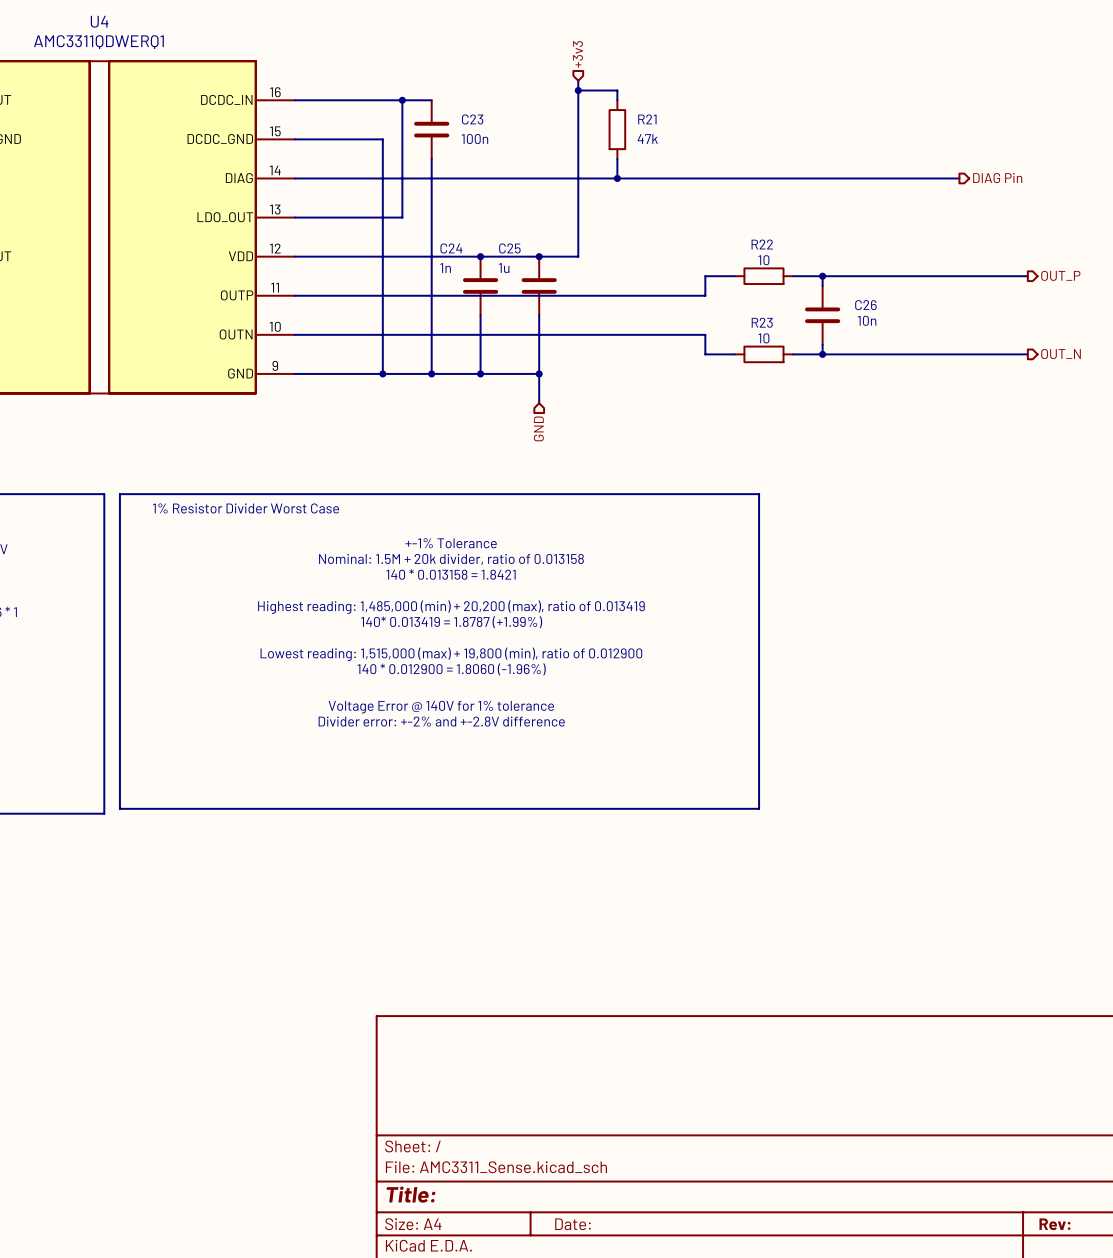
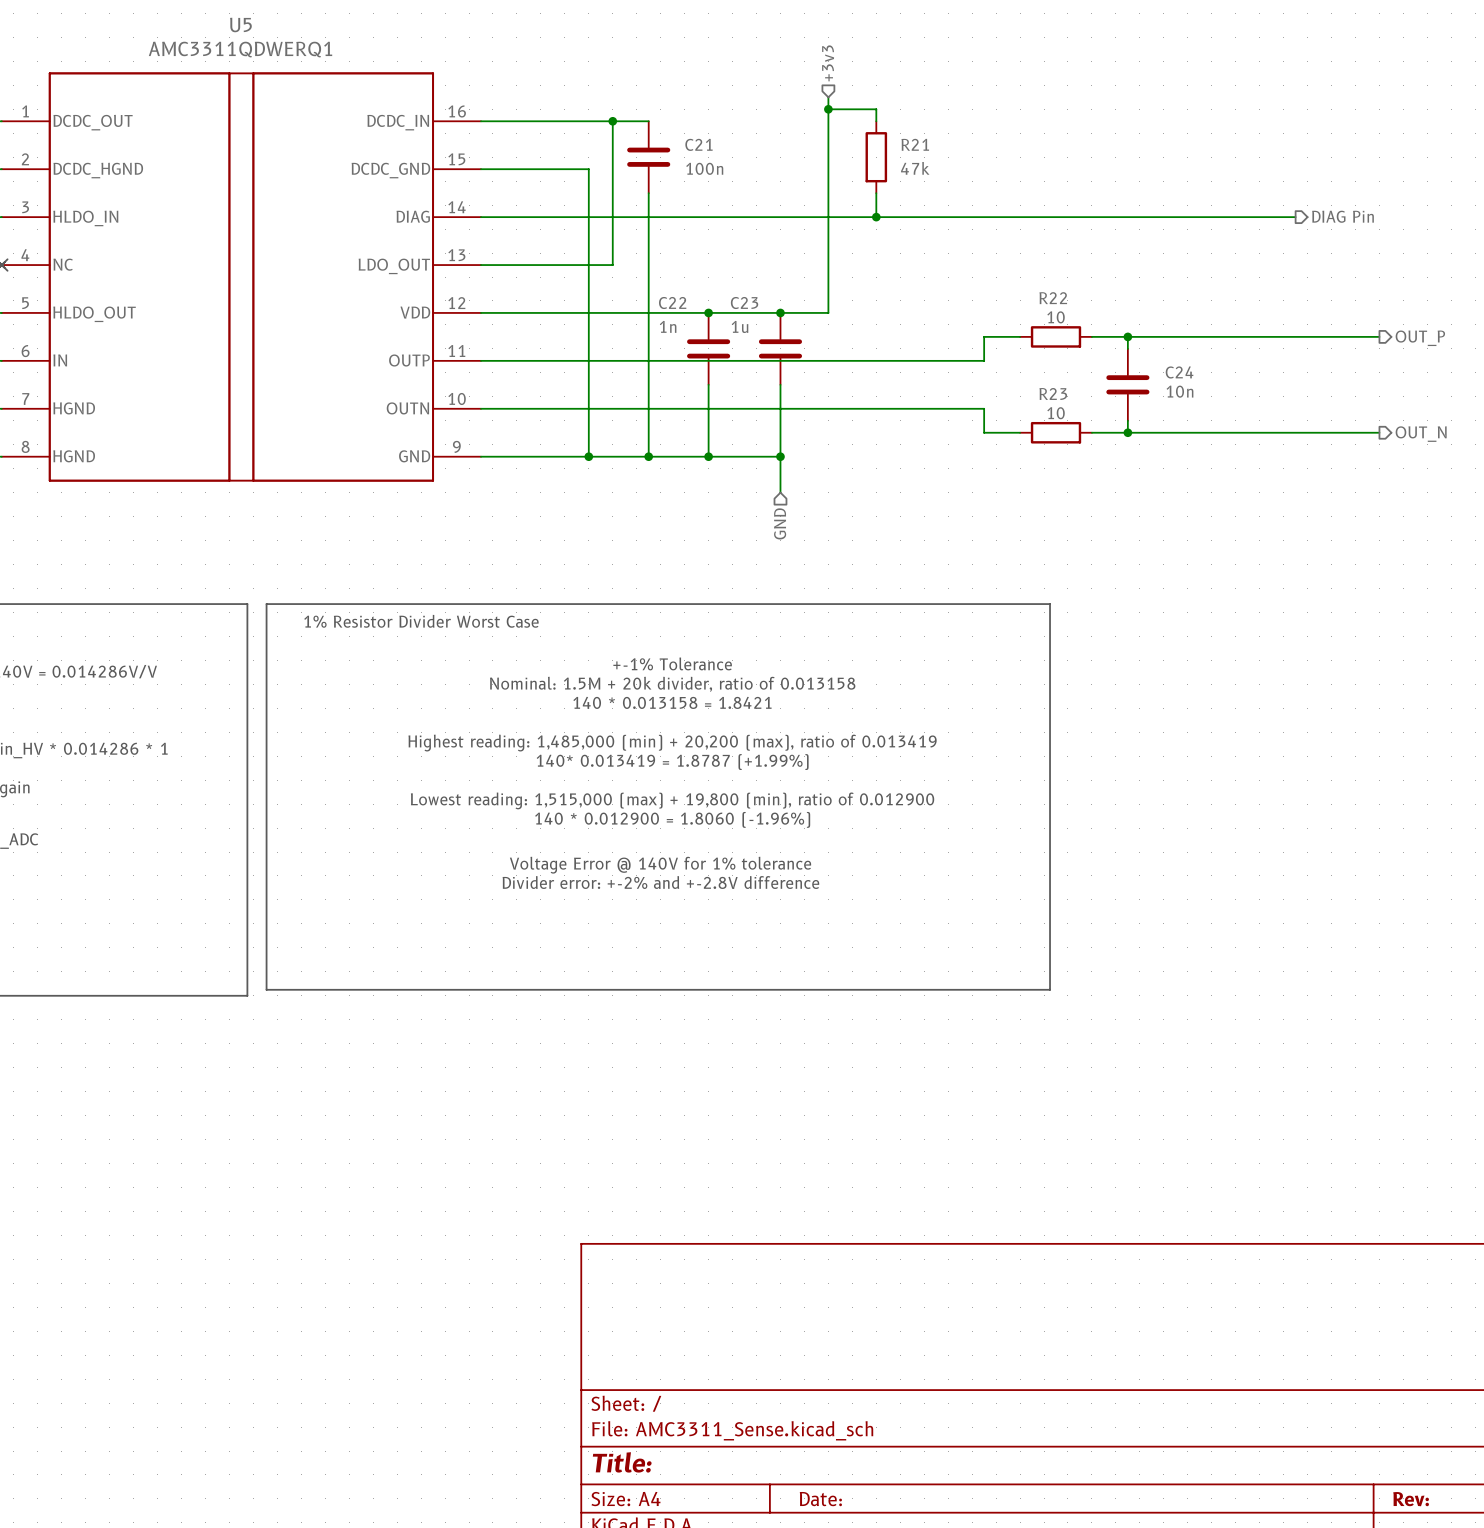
U4 name: U4 (99, 21) -> U5 (240, 24)
C23 name: C23 (472, 119) -> C21 (698, 144)
C24 name: C24 (451, 248) -> C22 (672, 303)
C25 name: C25 (509, 248) -> C23 (744, 303)
C26 name: C26 (865, 305) -> C24 (1179, 372)

